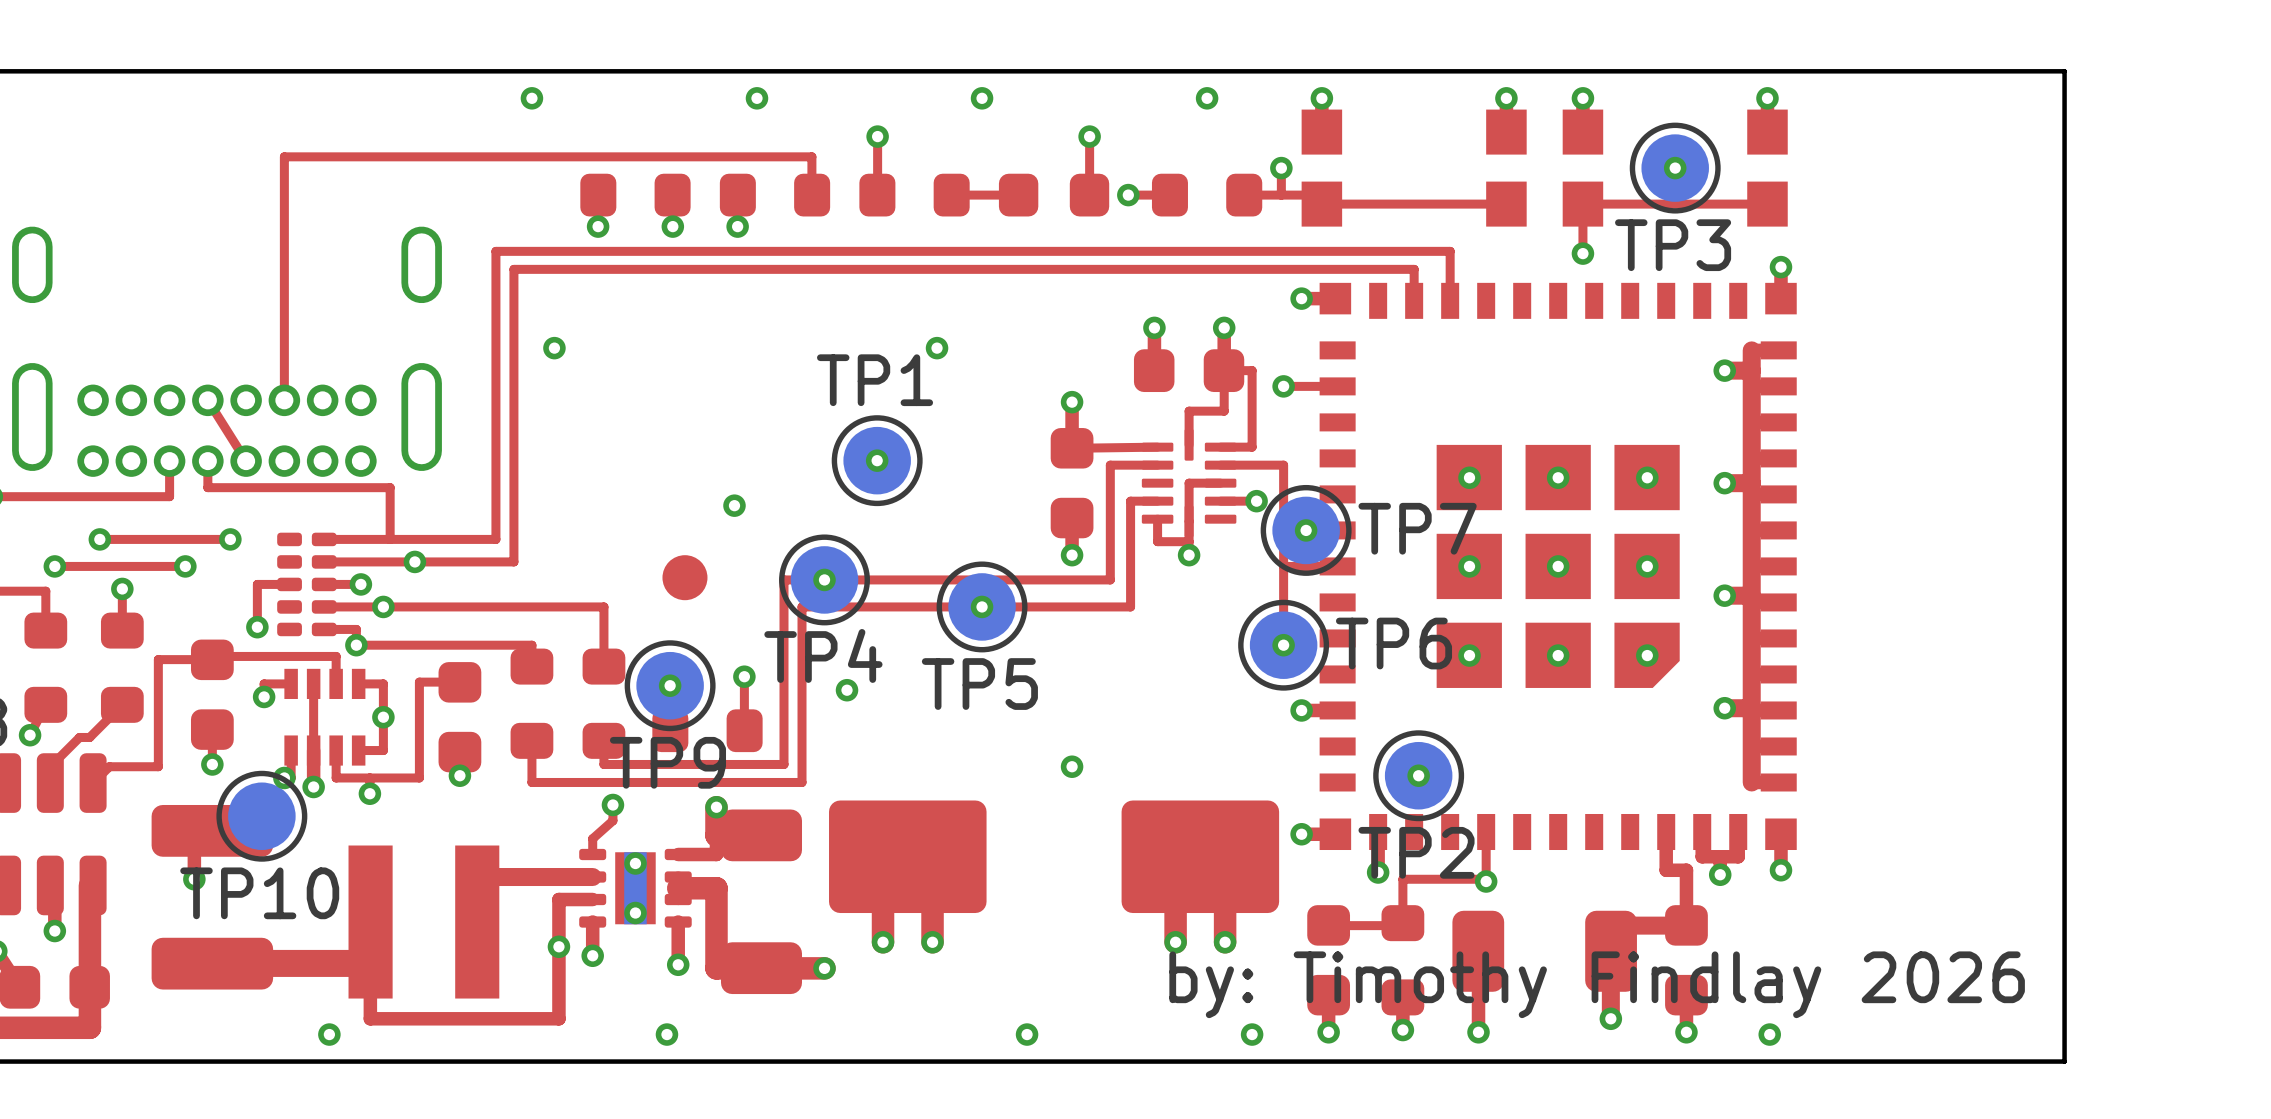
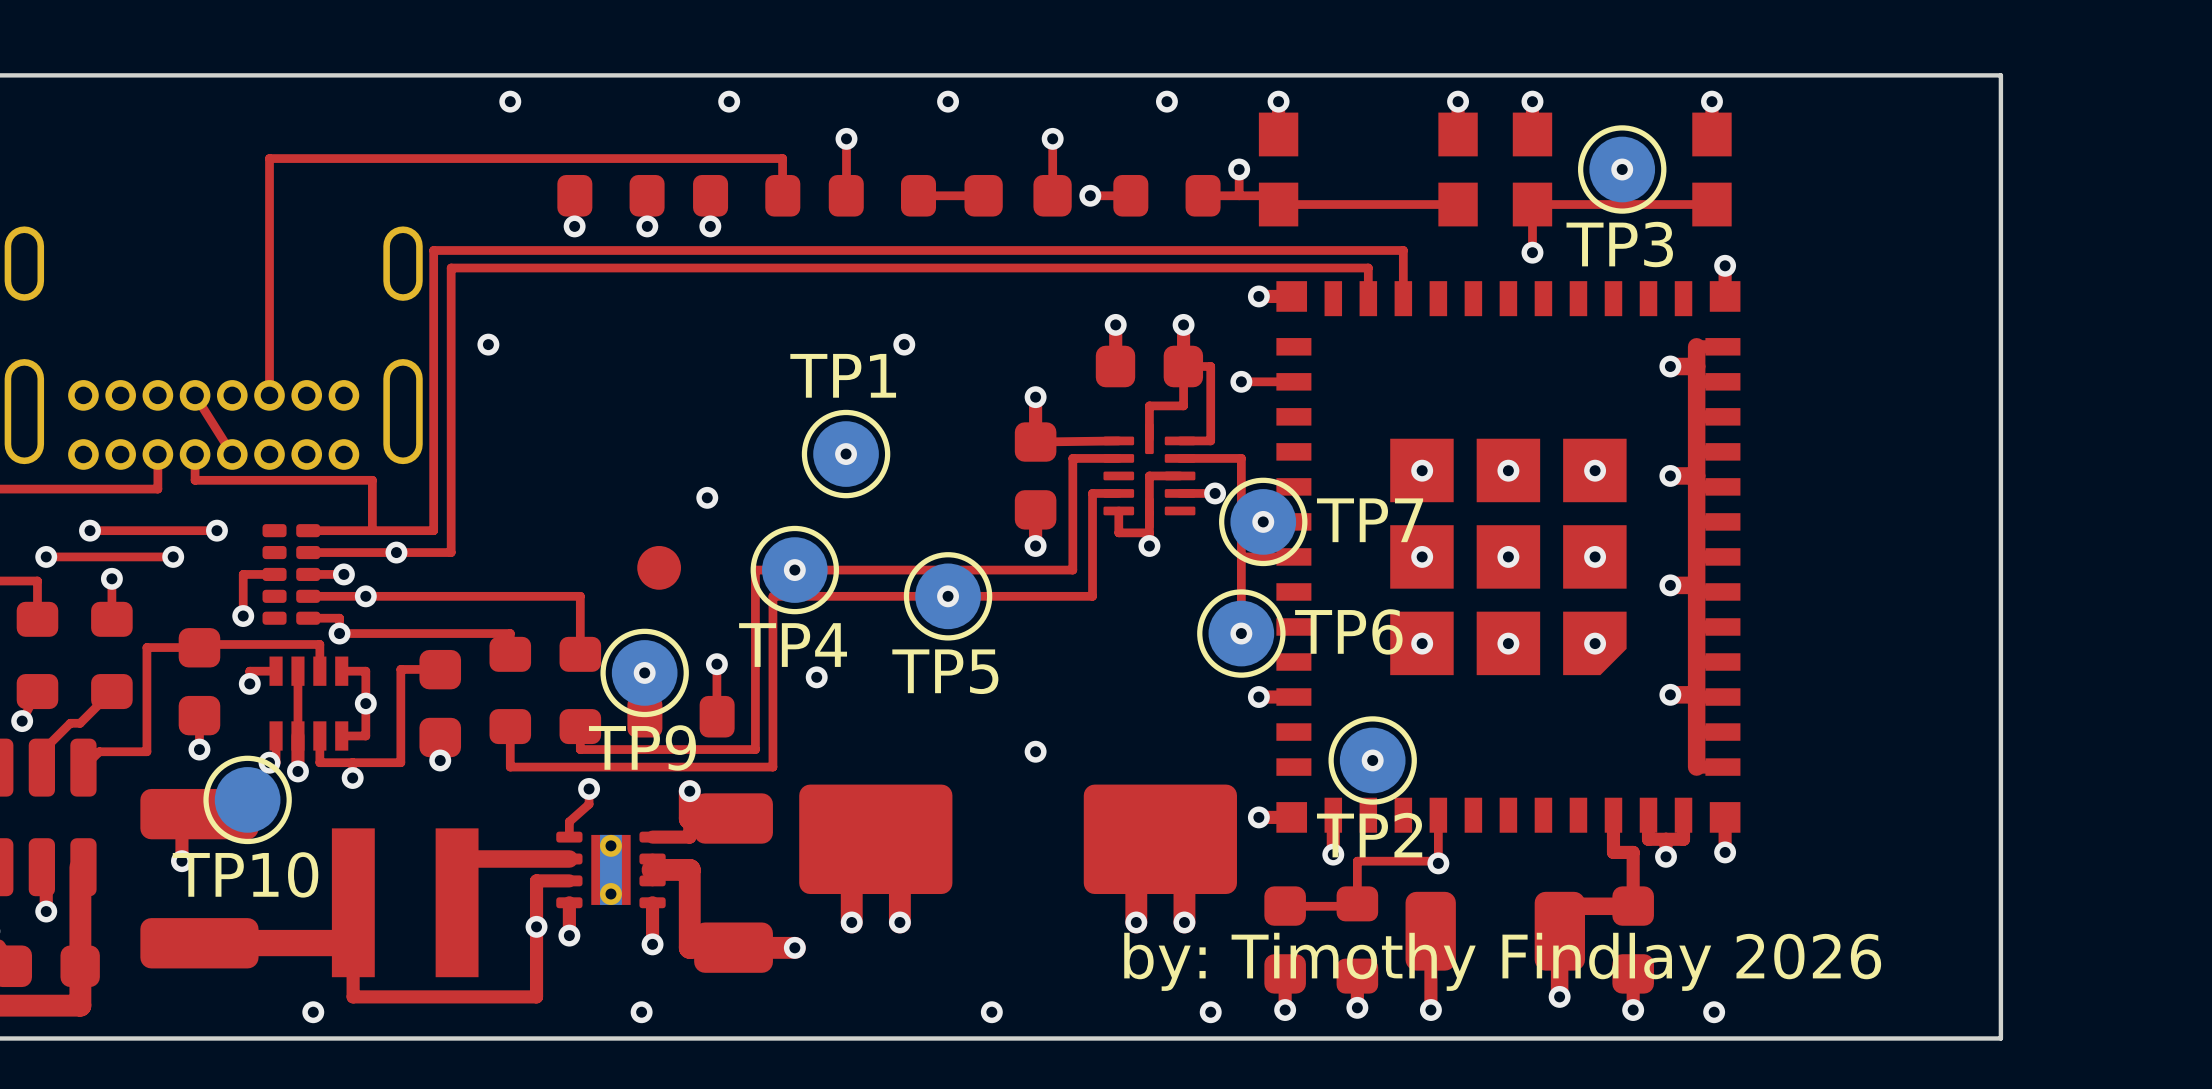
top track: (495, 251) (495, 539) (453, 539) -> (475, 250) (433, 250) (433, 530)
top track: (513, 269) (513, 561) (471, 561) -> (492, 268) (451, 268) (451, 552)
via position: (554, 348) -> (488, 344)

